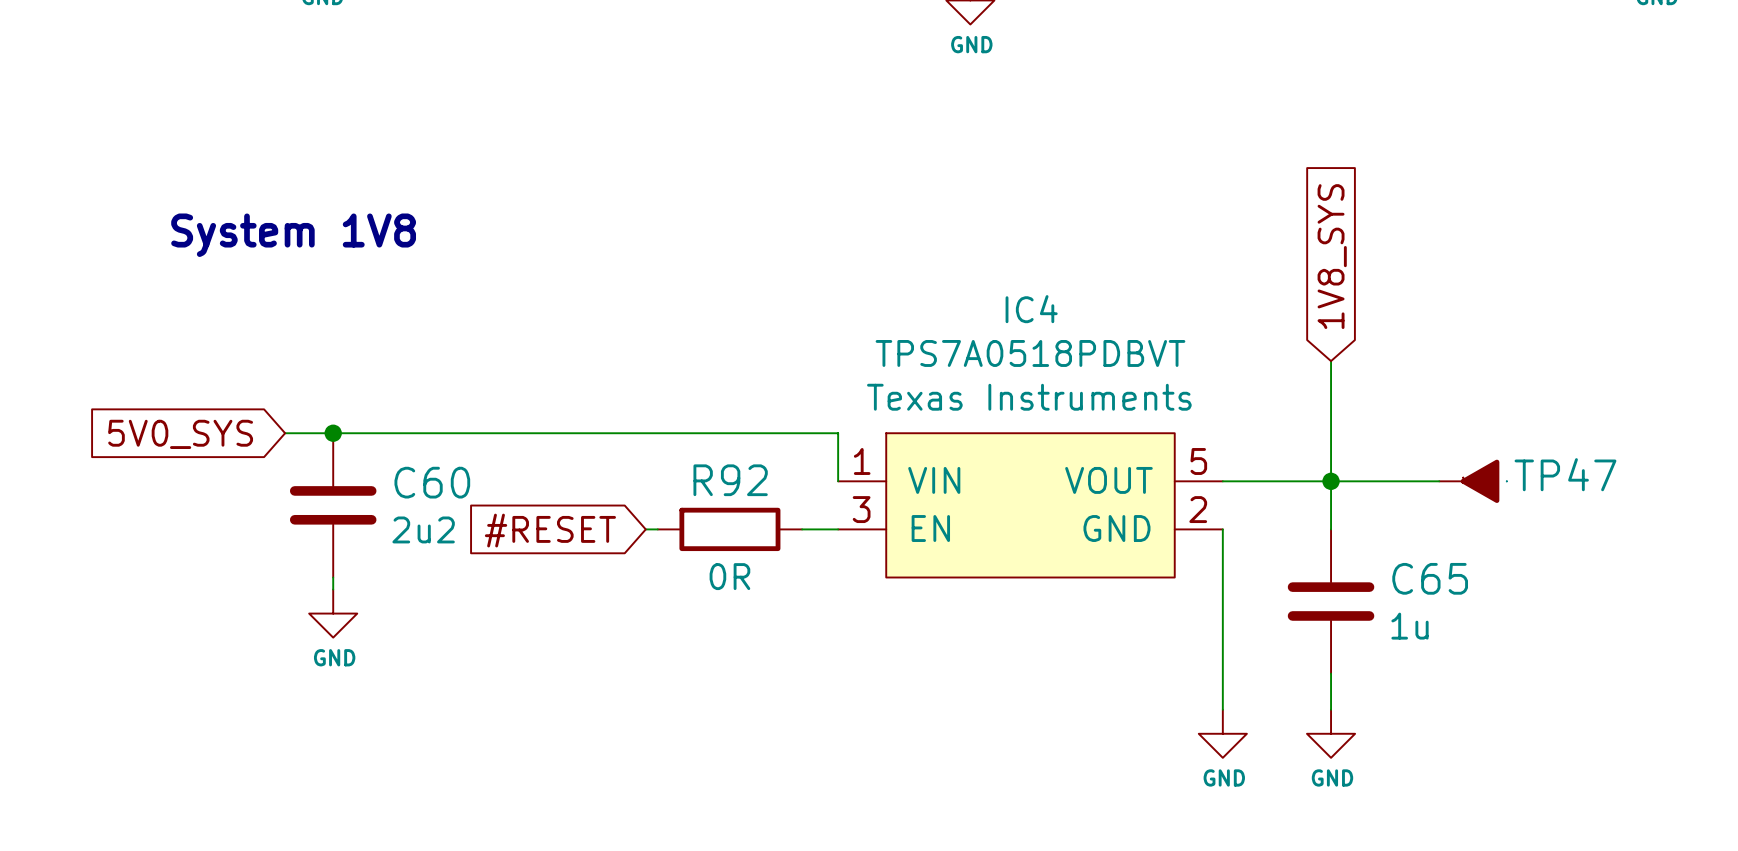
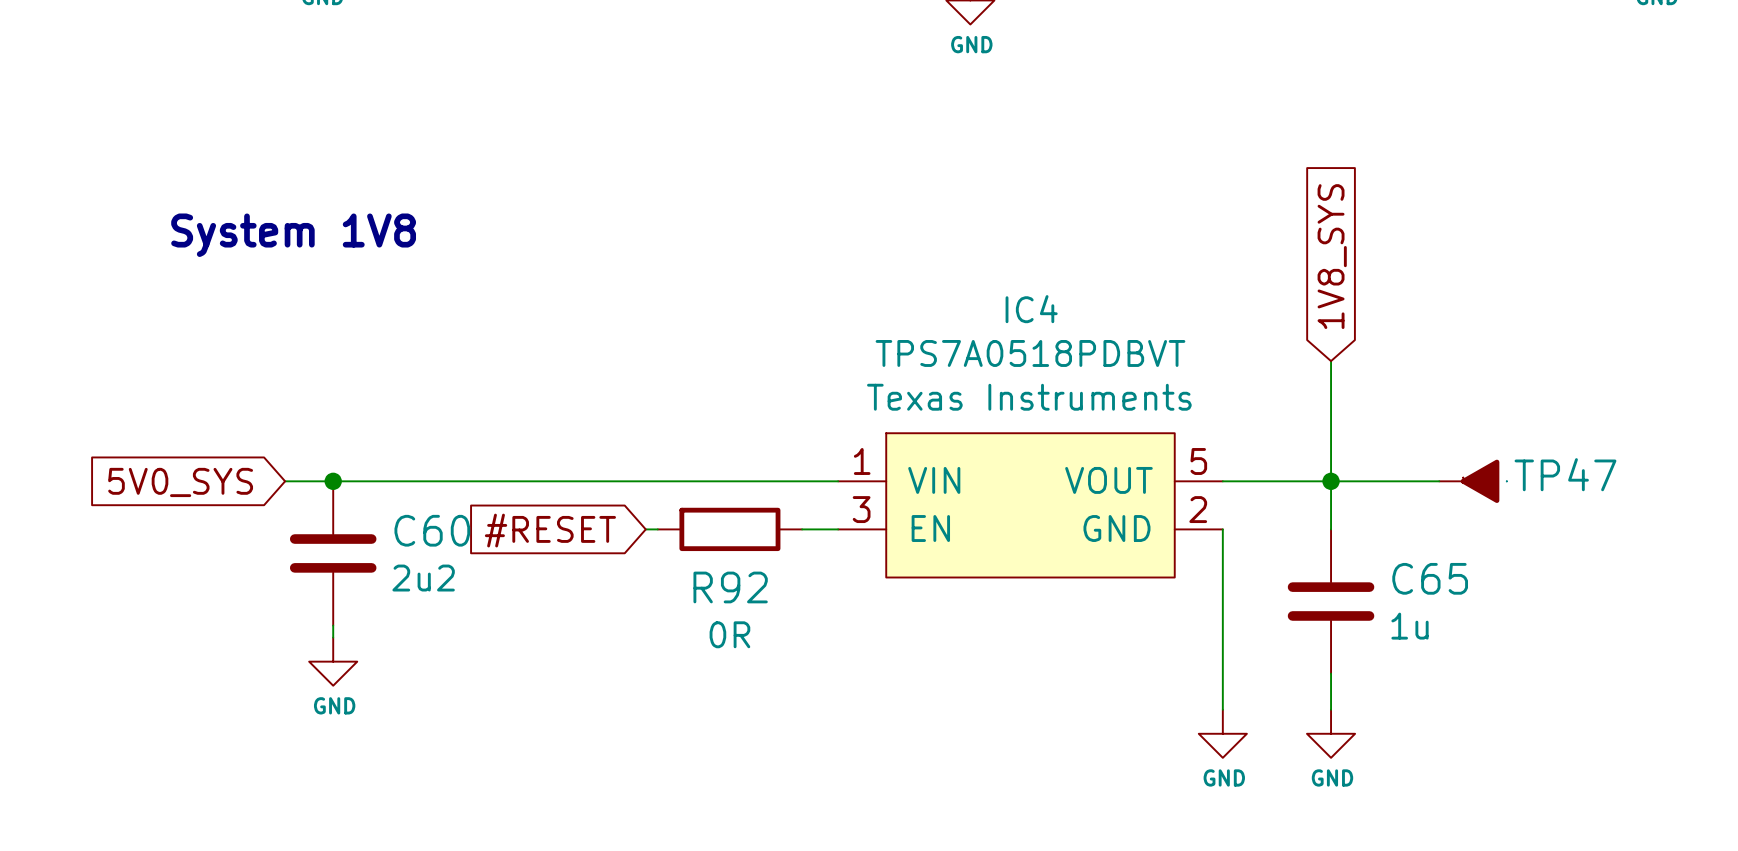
wire: (285, 433) (838, 433) (838, 481) -> (285, 481) (838, 481)
junction position: (333, 433) -> (333, 481)
global label position: 5V0_SYS (180, 434) -> 5V0_SYS (180, 482)
R92 name position: R92 (730, 480) -> R92 (730, 587)
C60 position: (333, 505) -> (333, 553)
R92 text position: 0R (729, 576) -> 0R (729, 634)
power symbol position: GND (333, 613) -> GND (333, 661)

